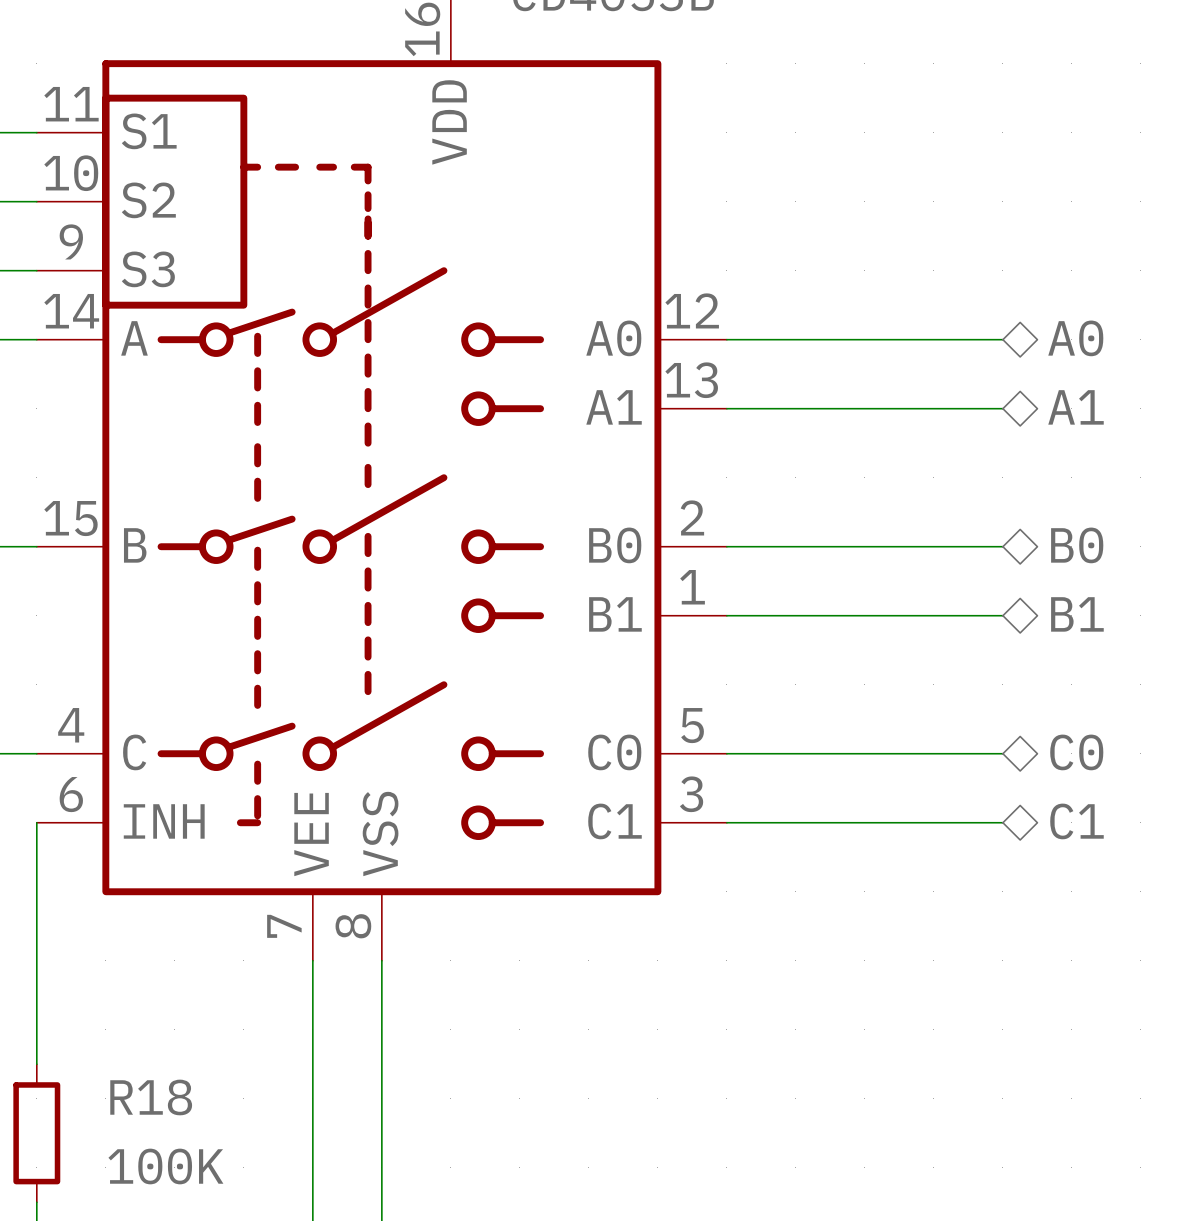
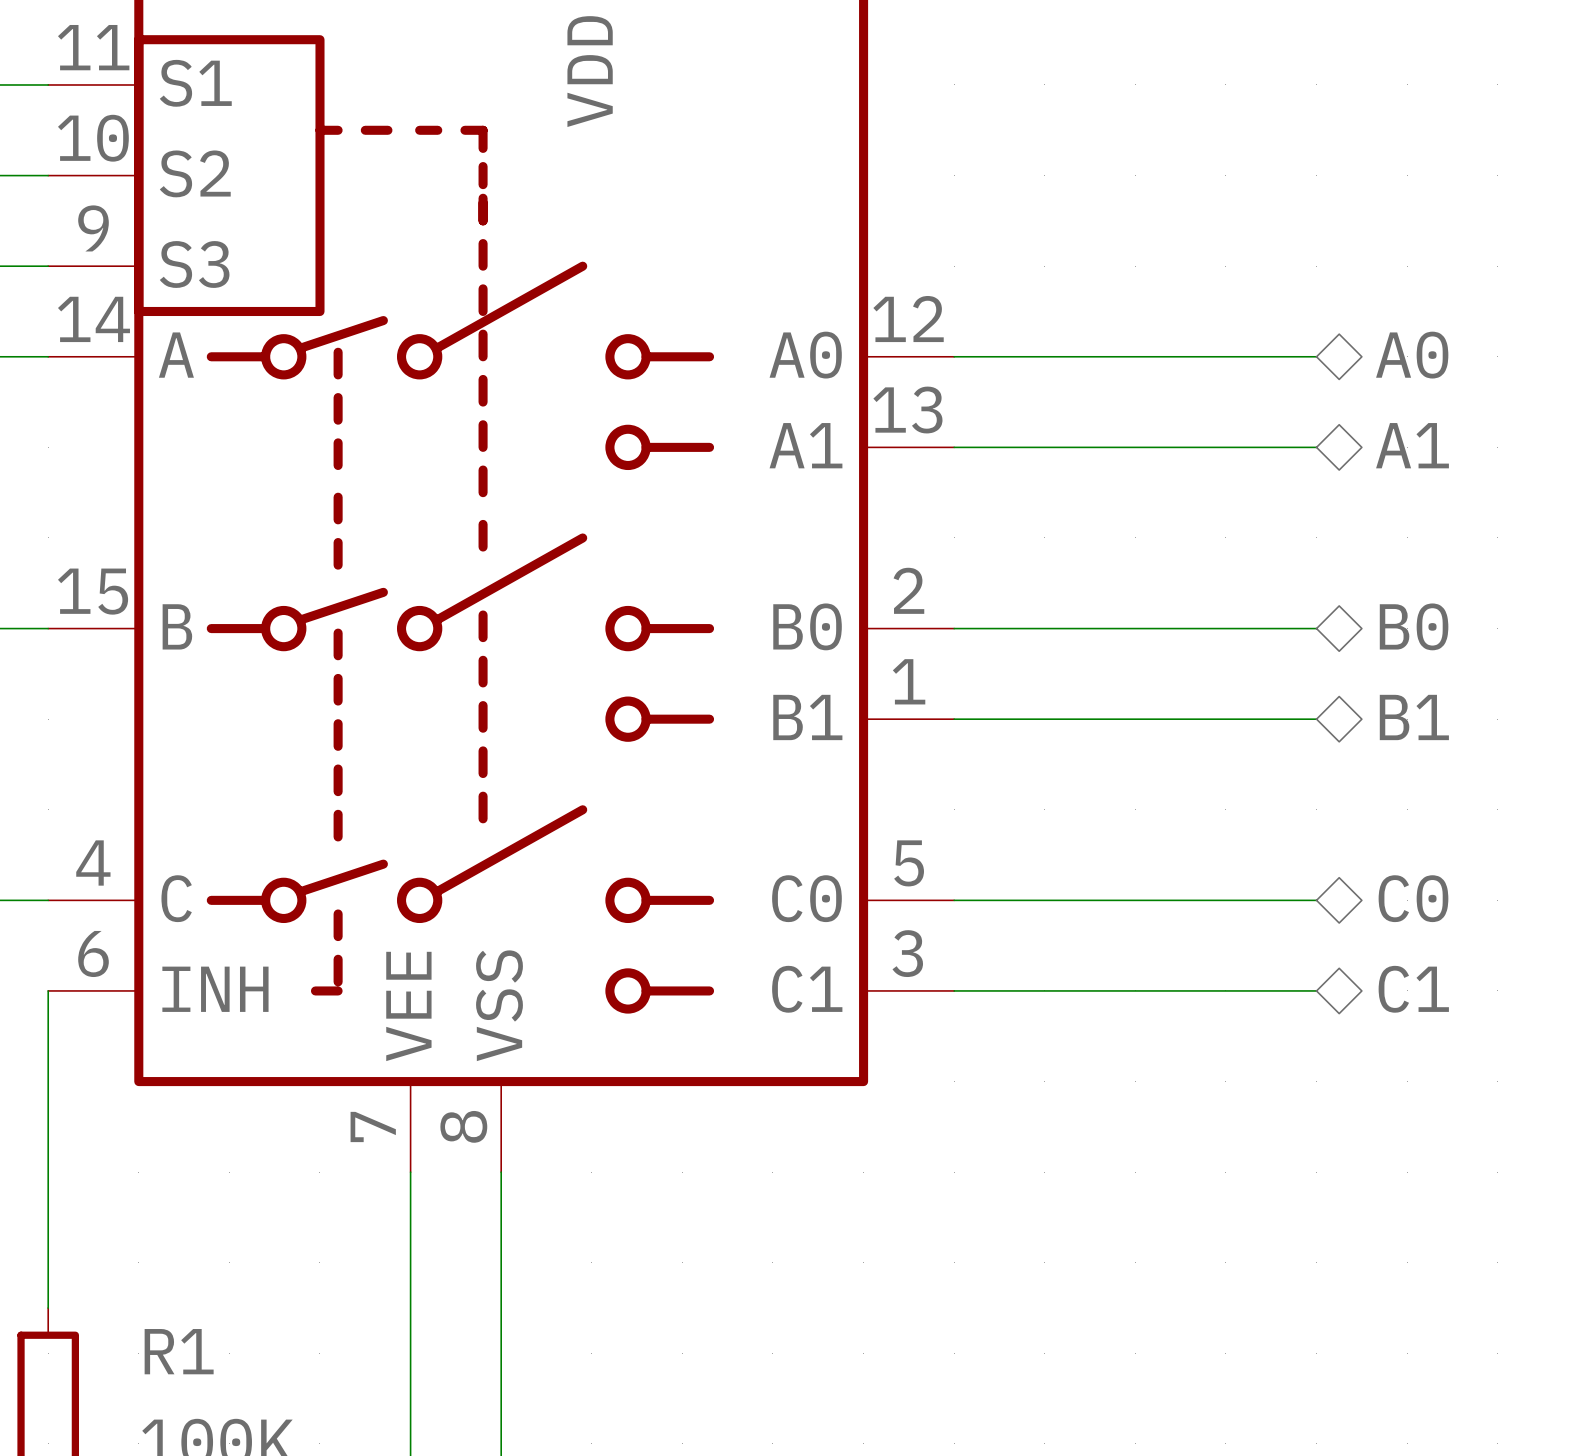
R18 name: R18 (151, 1097) -> R1 (179, 1351)

